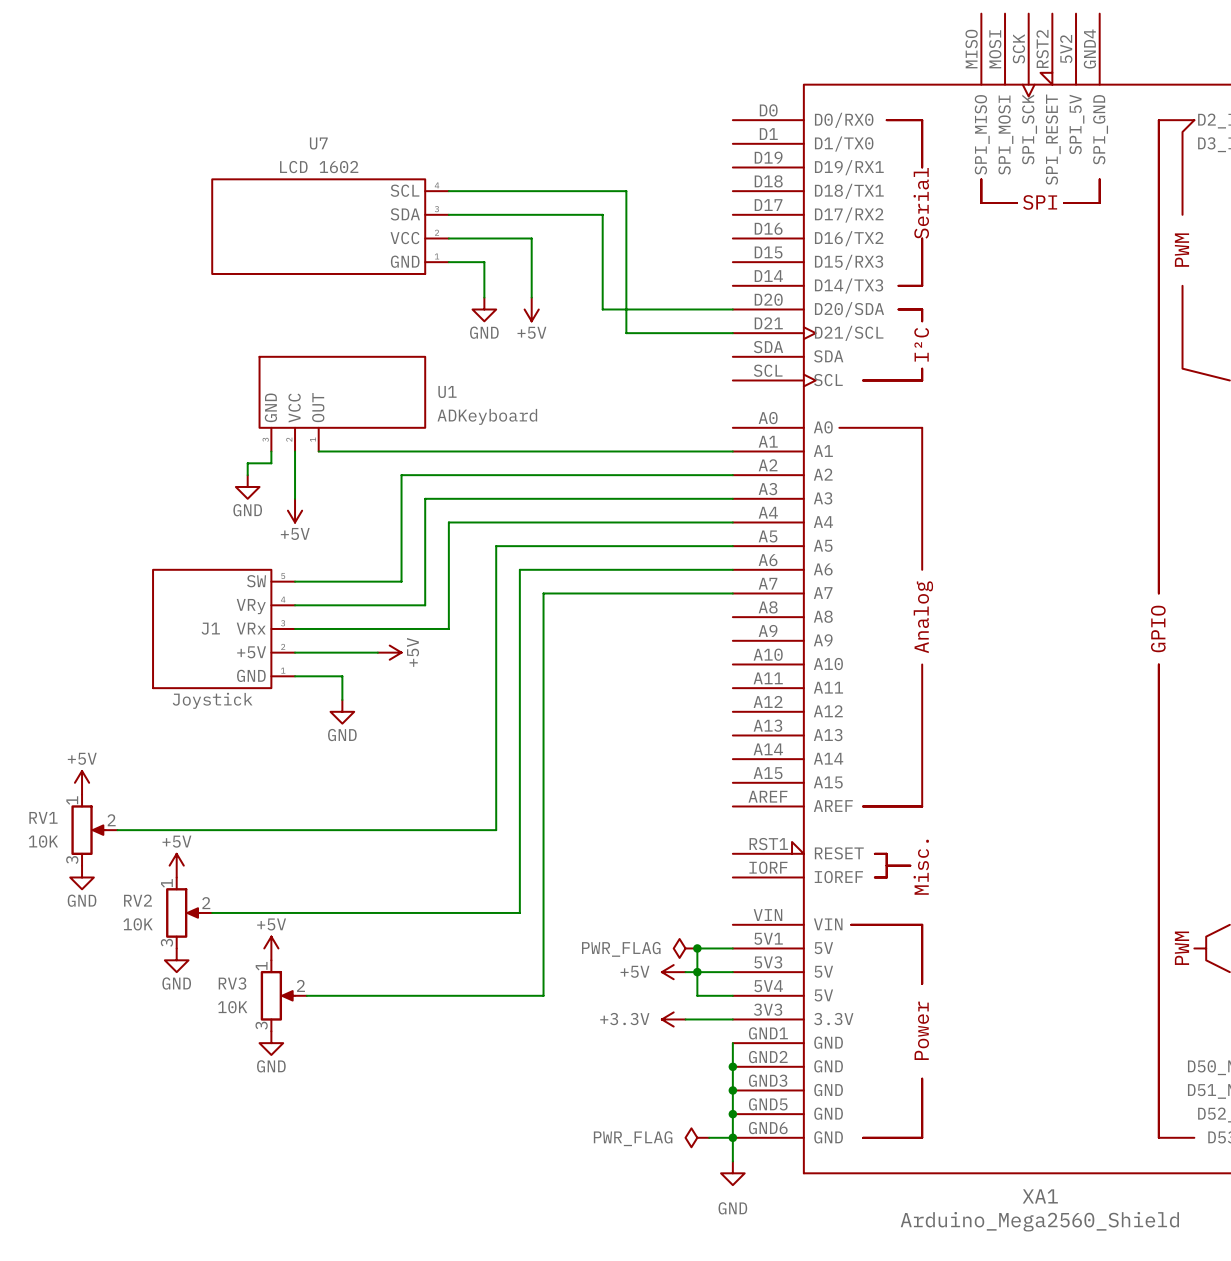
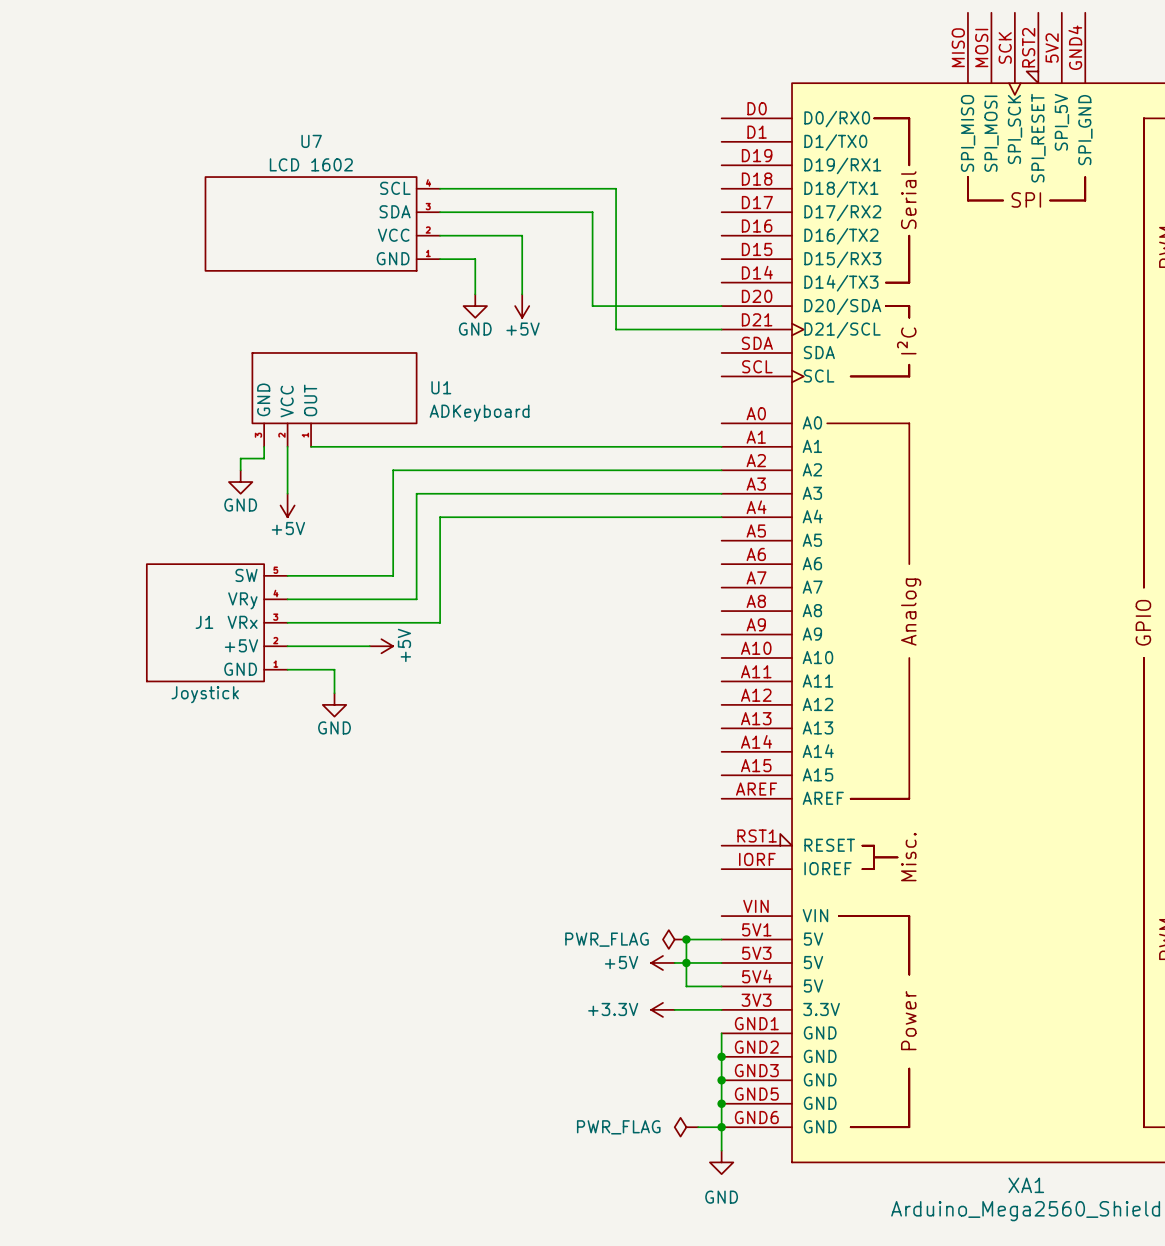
wire: (732, 546) (496, 546) (496, 830) (117, 830) -> none
wire: (732, 569) (519, 569) (519, 912) (212, 912) -> none
wire: (732, 593) (543, 593) (543, 995) (306, 995) -> none
power symbol: +5V (82, 782) -> none
RV1: 10K (94, 830) -> none
power symbol: +5V (176, 865) -> none
power symbol: GND (82, 877) -> none
RV2: 10K (189, 912) -> none
power symbol: +5V (271, 948) -> none
power symbol: GND (176, 960) -> none
RV3: 10K (283, 995) -> none
power symbol: GND (271, 1043) -> none

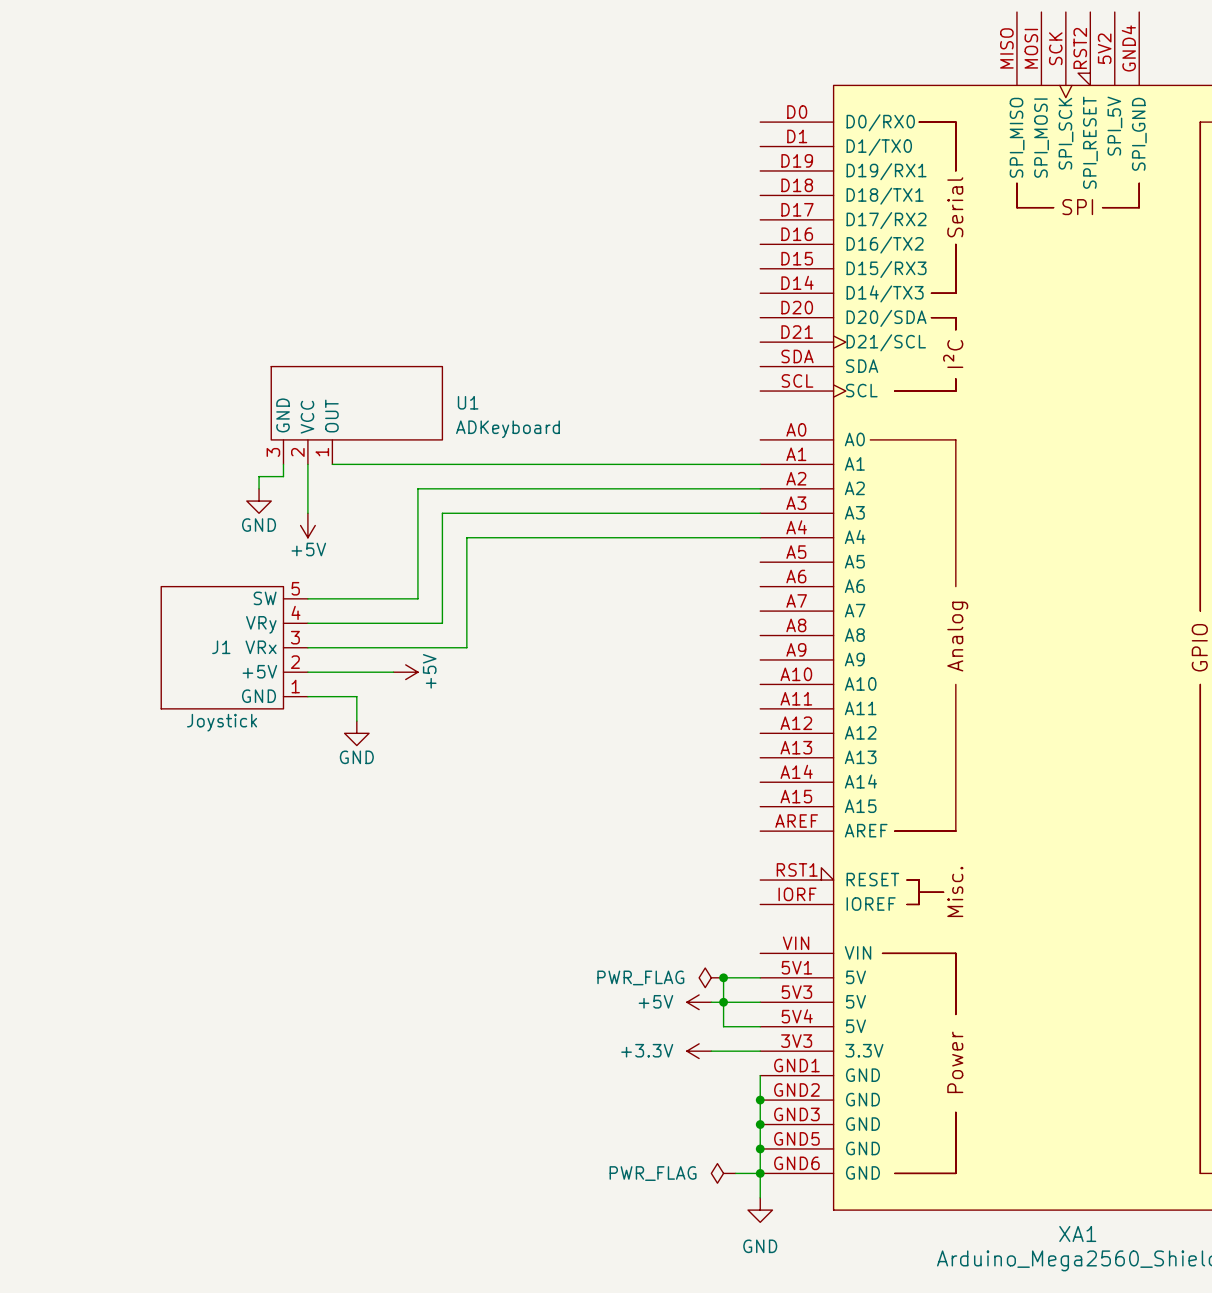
wire: (440, 188) (616, 188) (616, 329) (721, 329) -> none
wire: (440, 212) (592, 212) (592, 306) (721, 306) -> none
U7: LCD 1602 (322, 223) -> none
wire: (440, 235) (522, 235) (522, 294) -> none
wire: (440, 259) (475, 259) (475, 294) -> none
power symbol: GND (475, 306) -> none
power symbol: +5V (522, 306) -> none
U1 symbol: [252, 352, 417, 447] -> [271, 366, 443, 465]
J1 symbol: [146, 564, 288, 682] -> [161, 586, 308, 709]

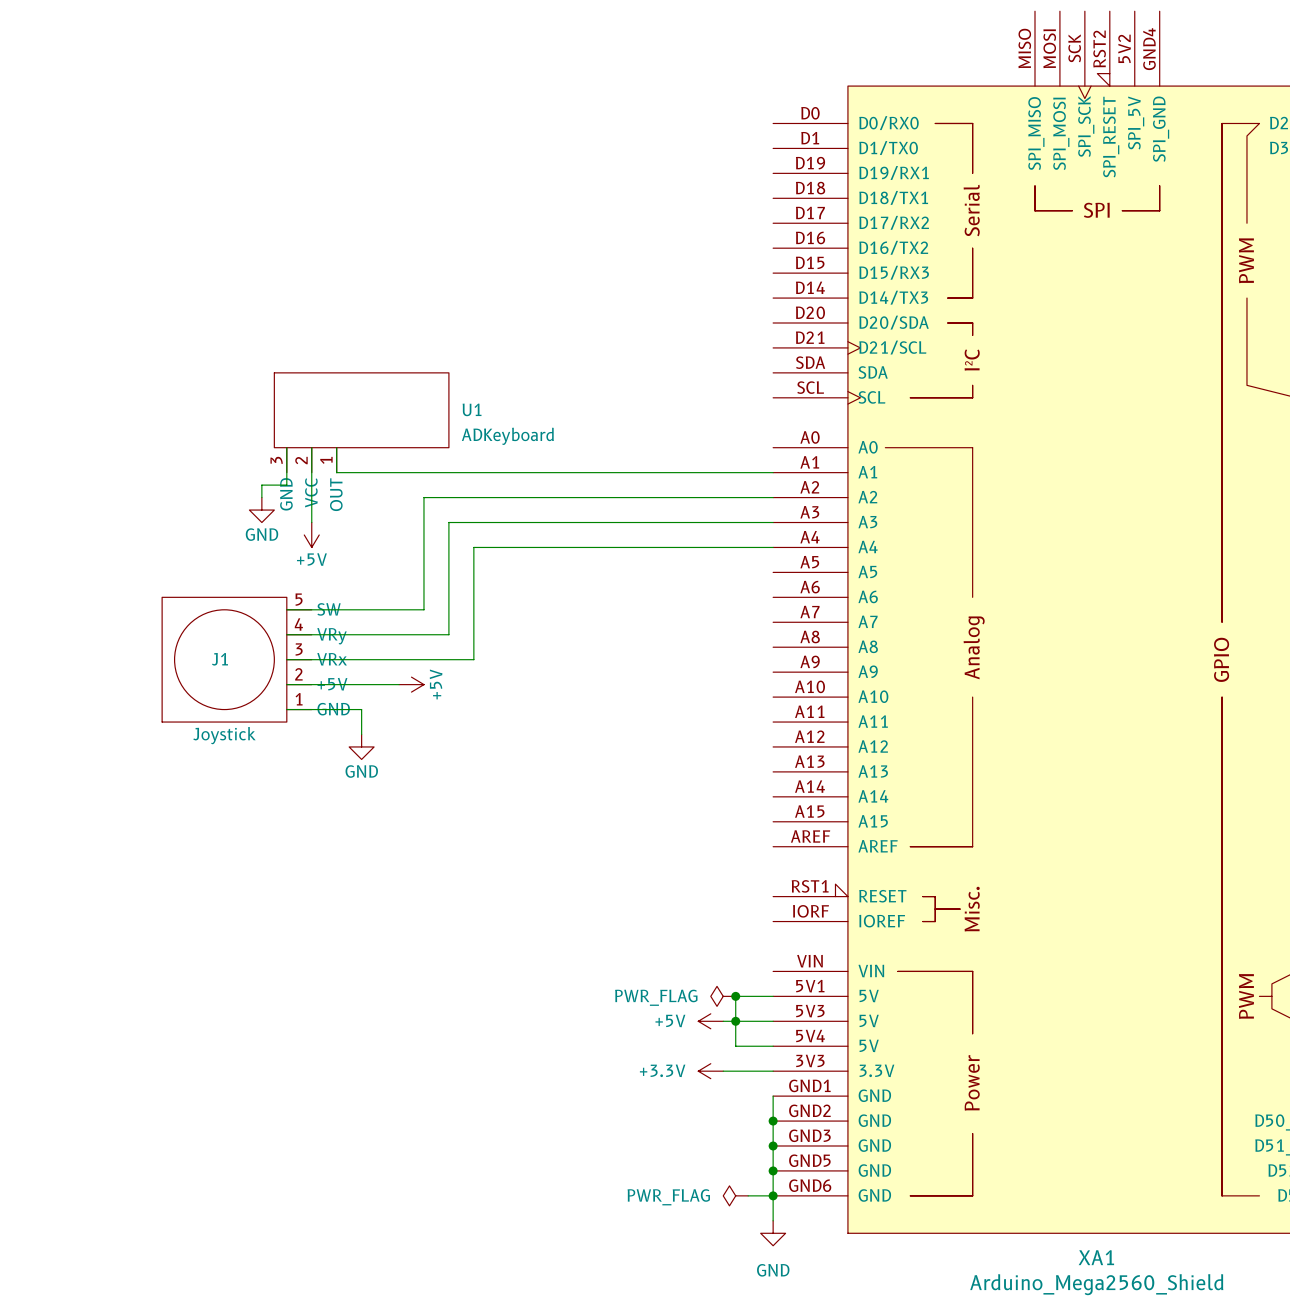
U1 symbol: [271, 366, 443, 465] -> [274, 372, 449, 473]
J1 symbol: [161, 586, 308, 709] -> [162, 597, 312, 723]

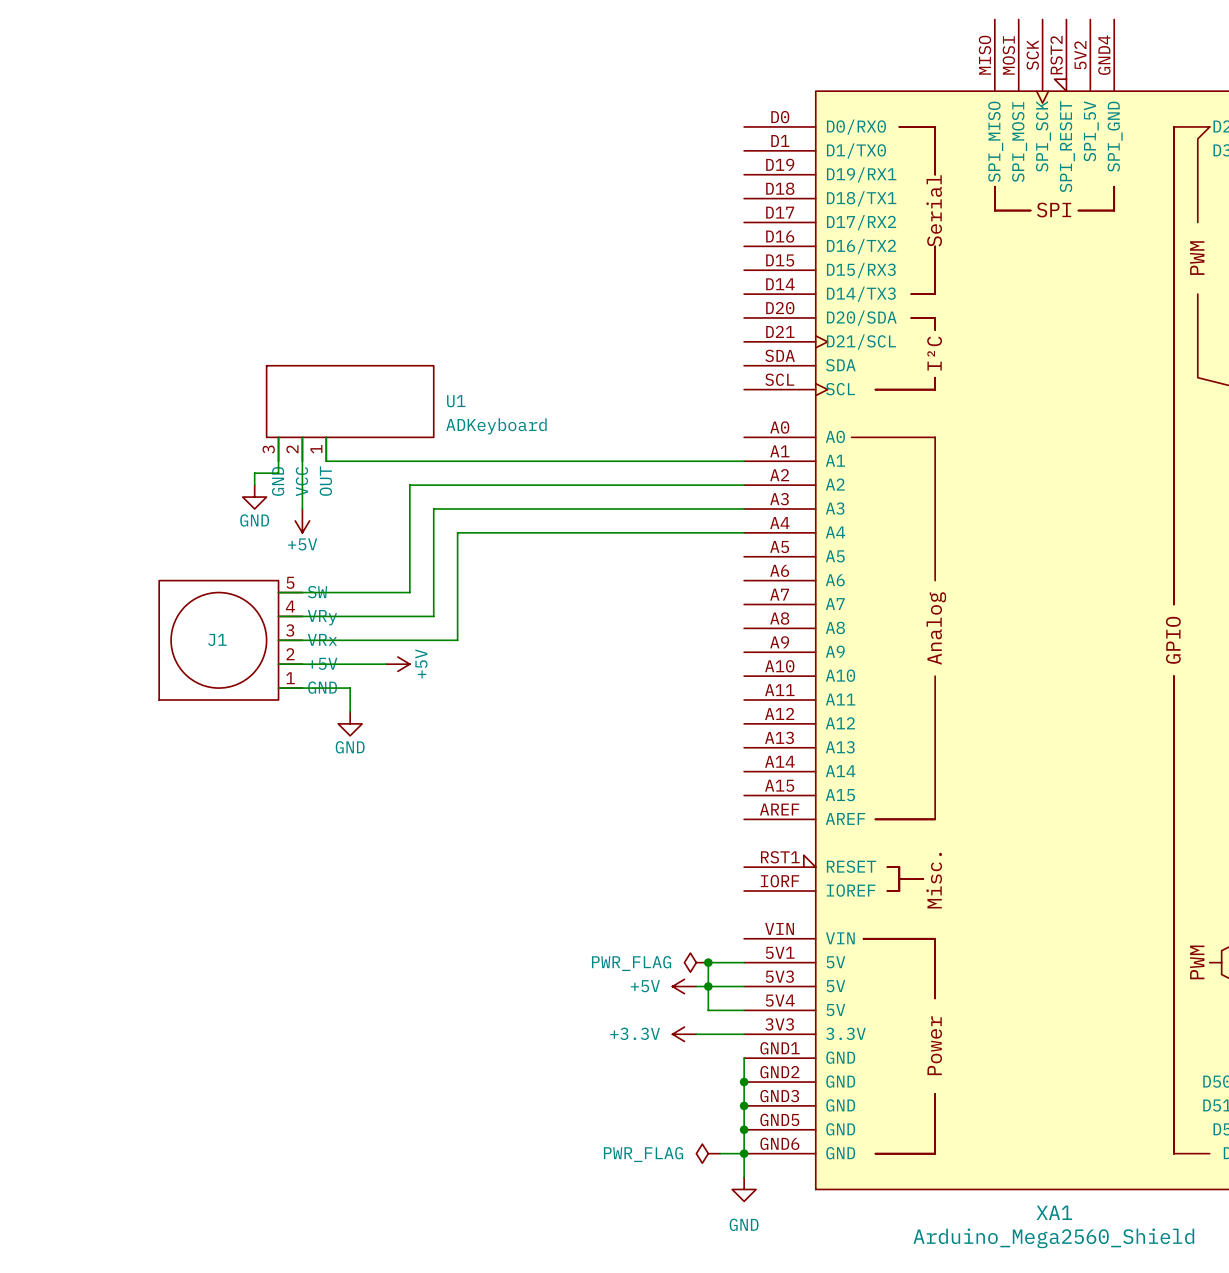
J1 value: Joystick (224, 735) -> none

